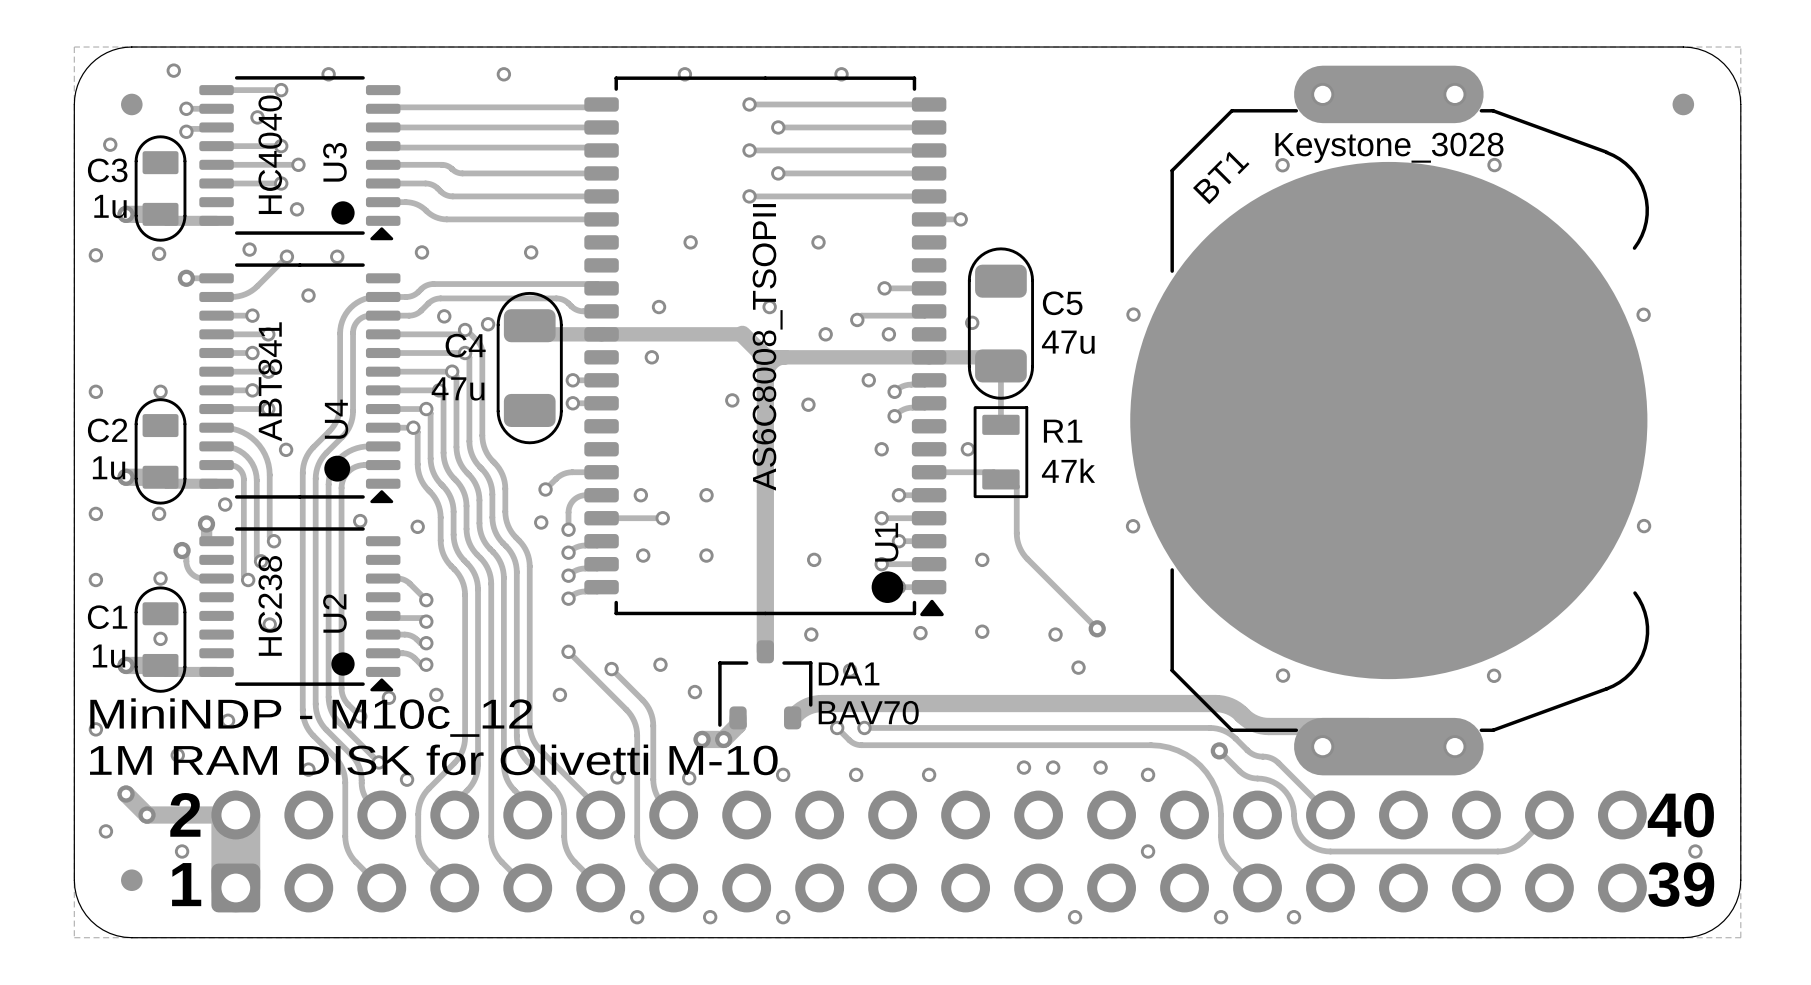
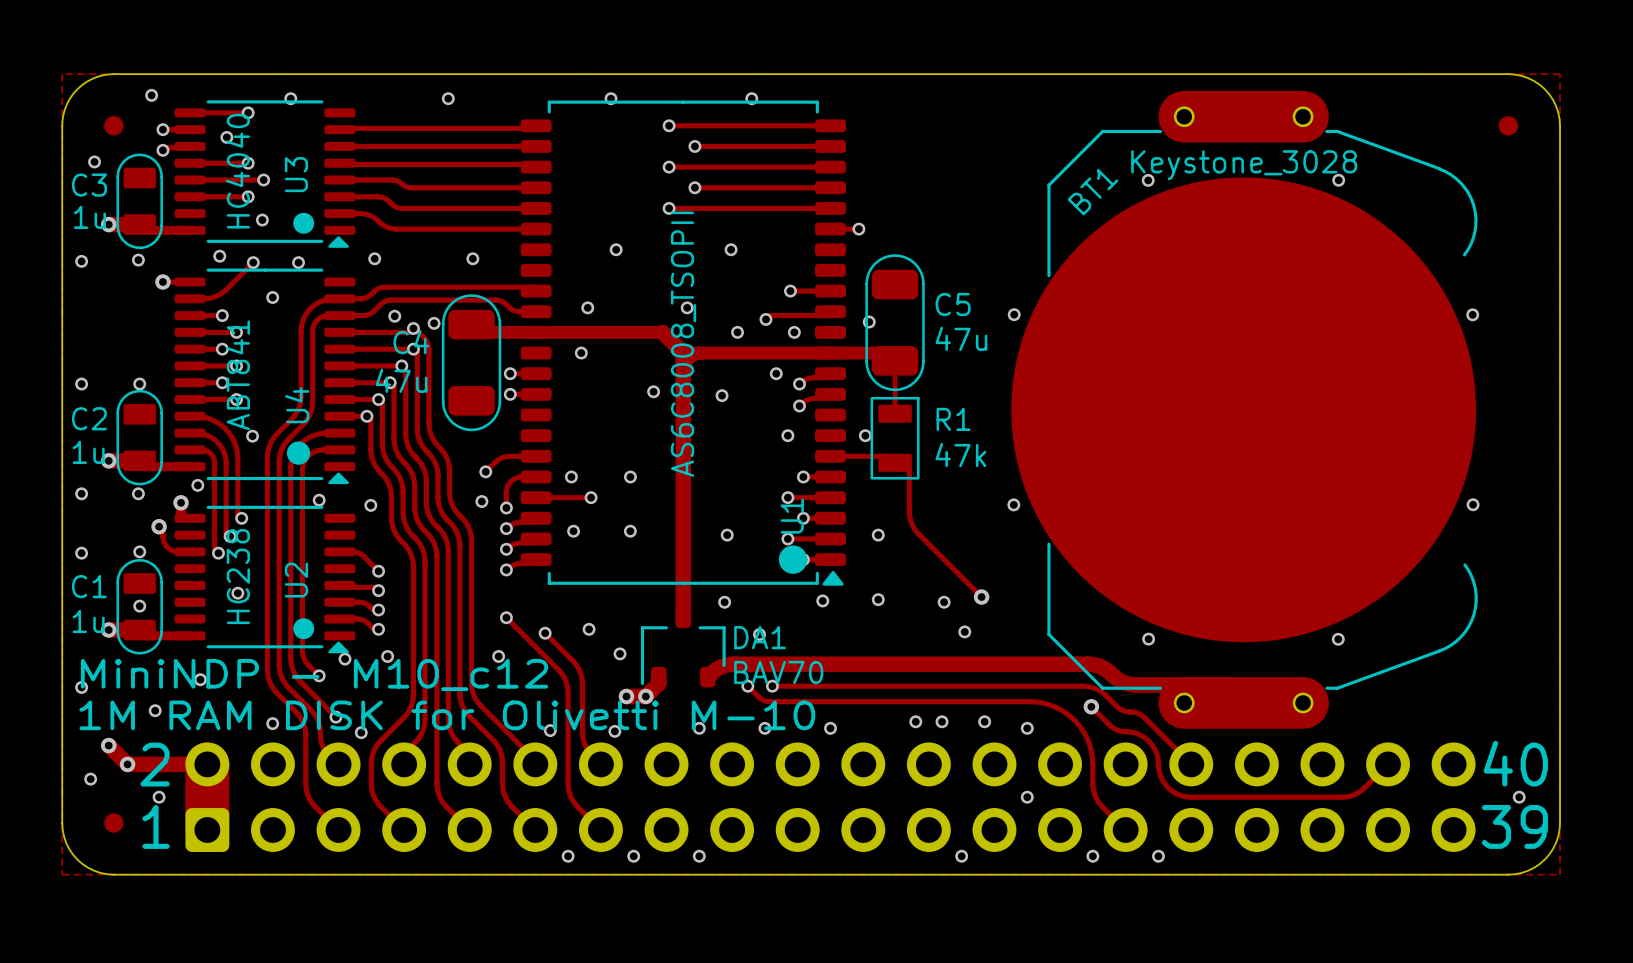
text: MiniNDP - M10c_12 (311, 717) -> MiniNDP - M10_c12 (314, 675)

